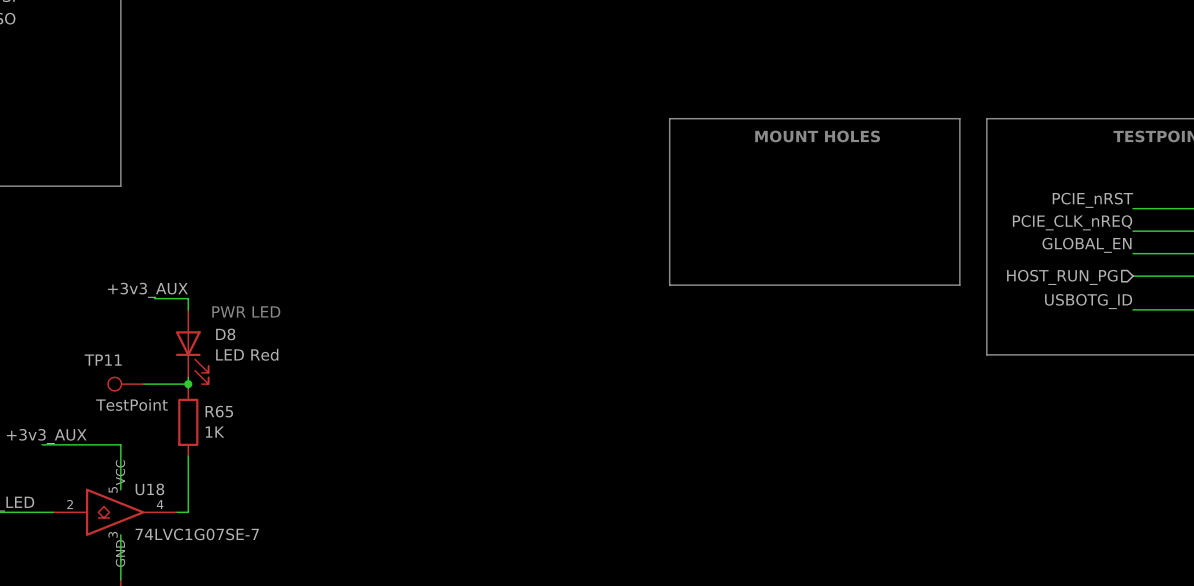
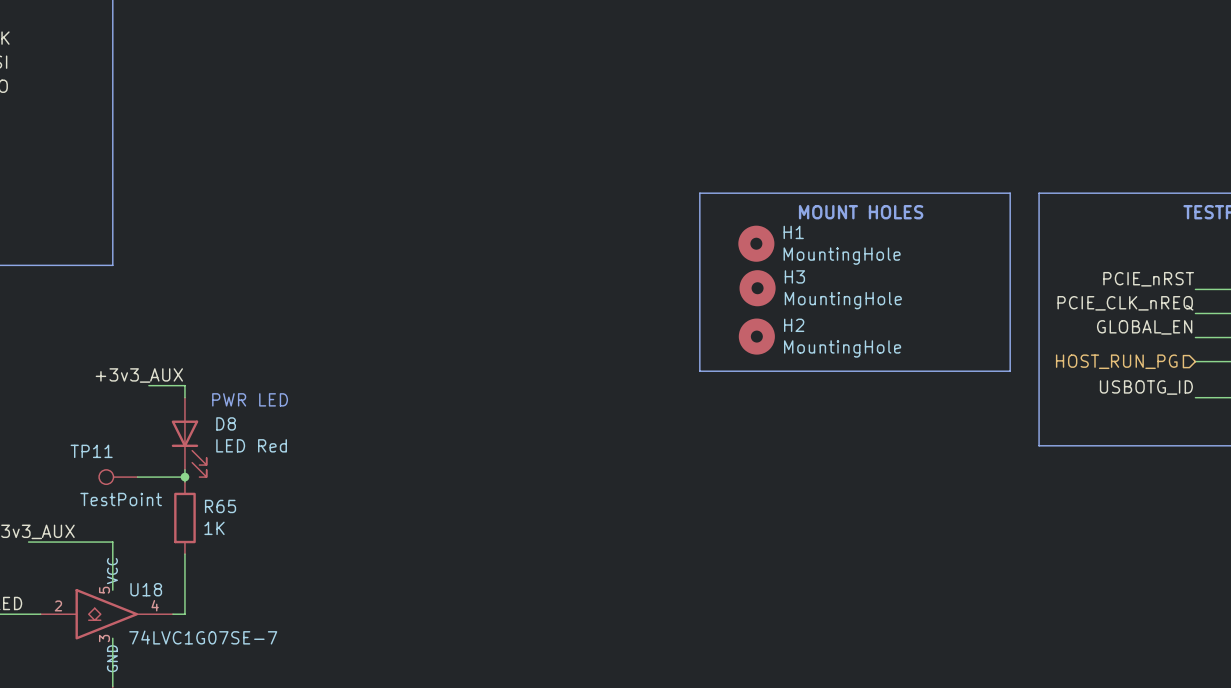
H1: none -> MountingHole (756, 243)
H3: none -> MountingHole (757, 288)
H2: none -> MountingHole (756, 336)

